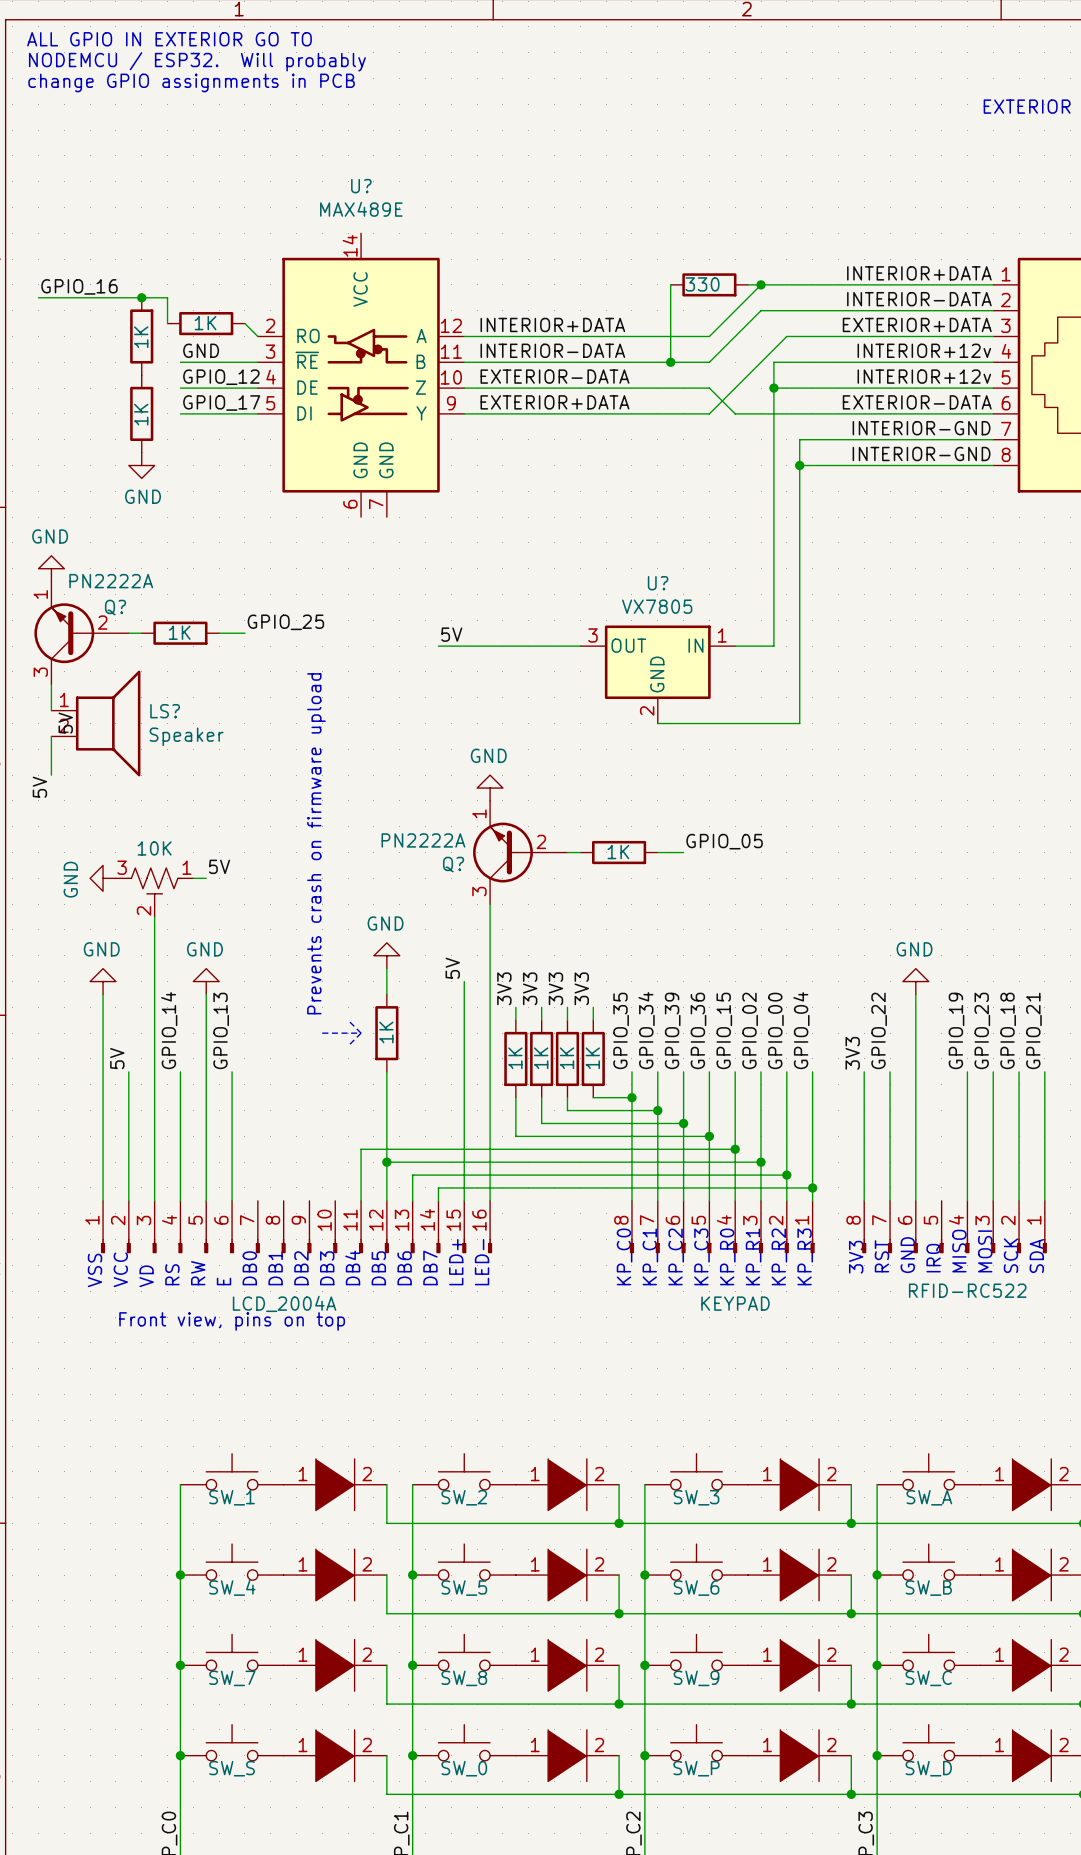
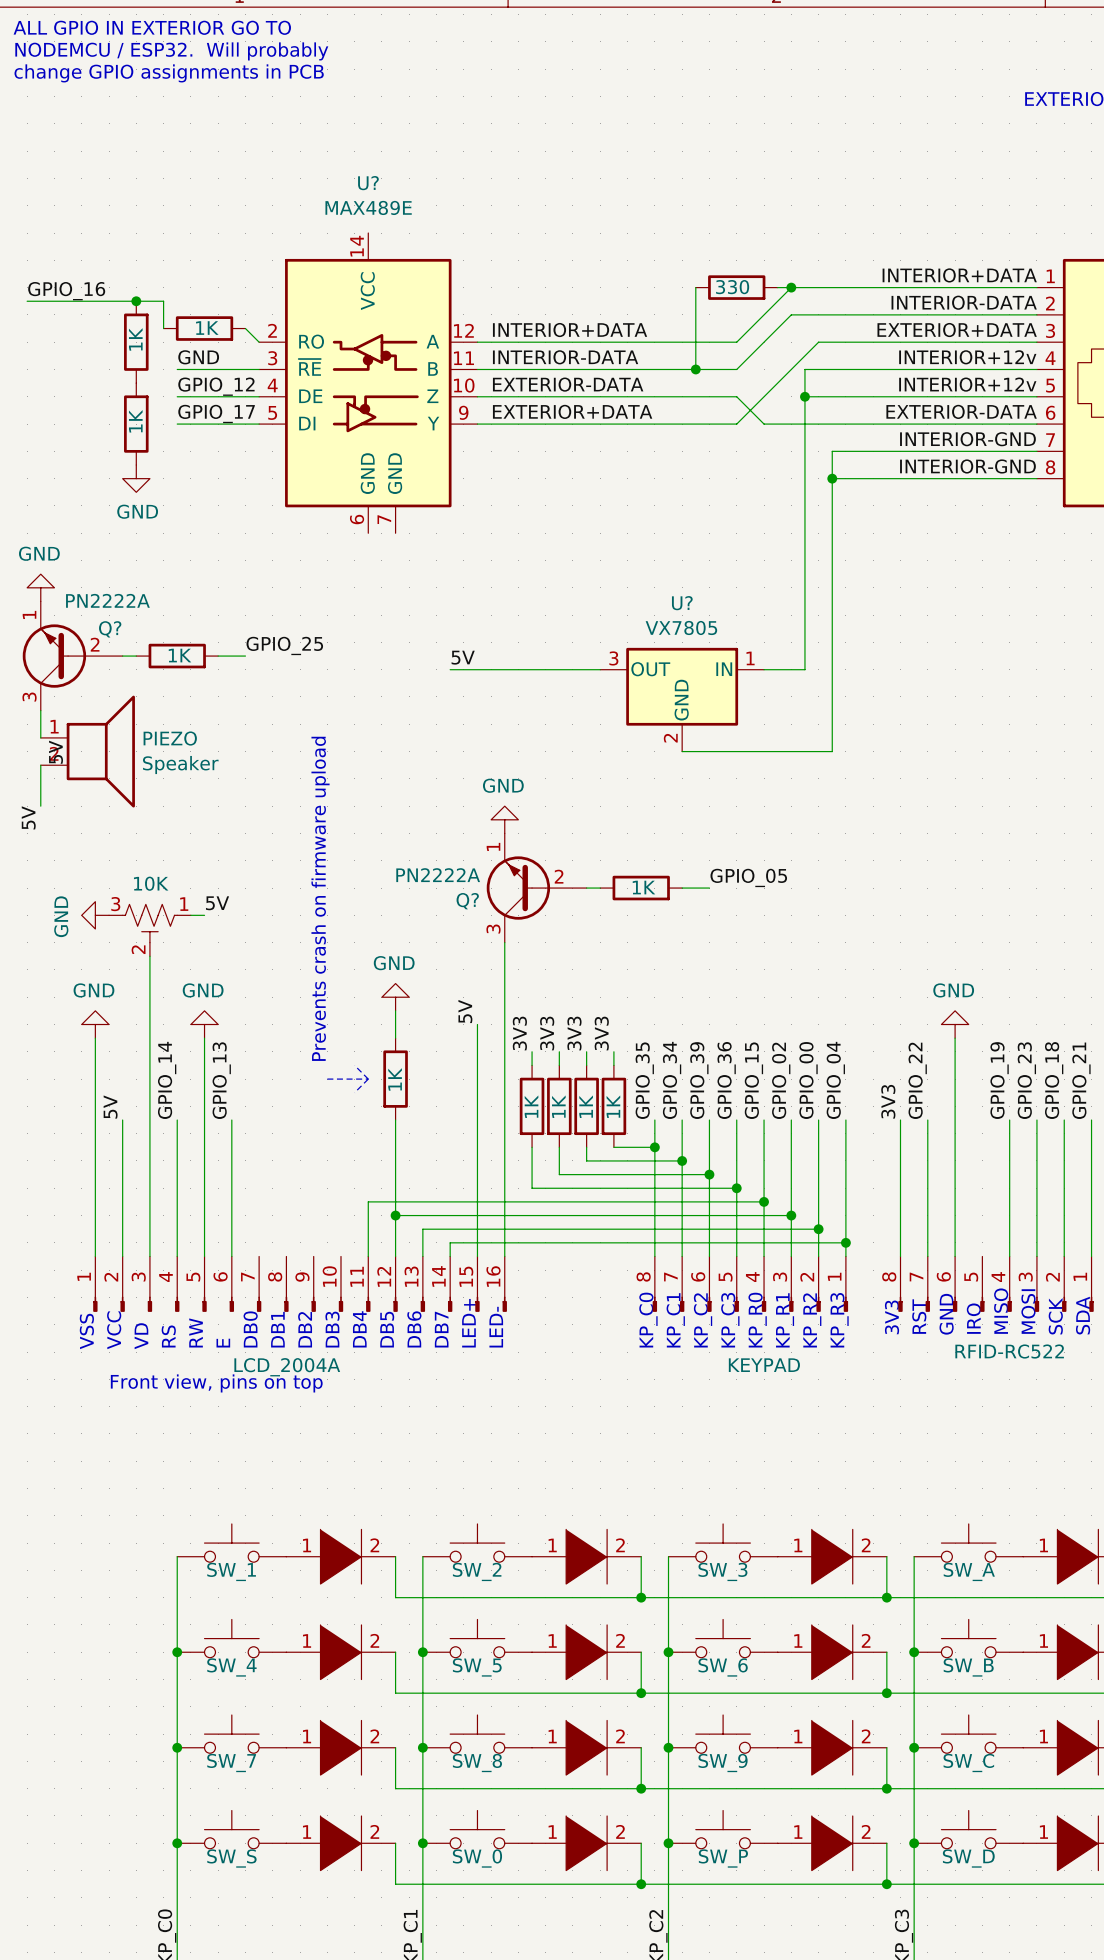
LS? name: LS? (165, 711) -> PIEZO (170, 738)

